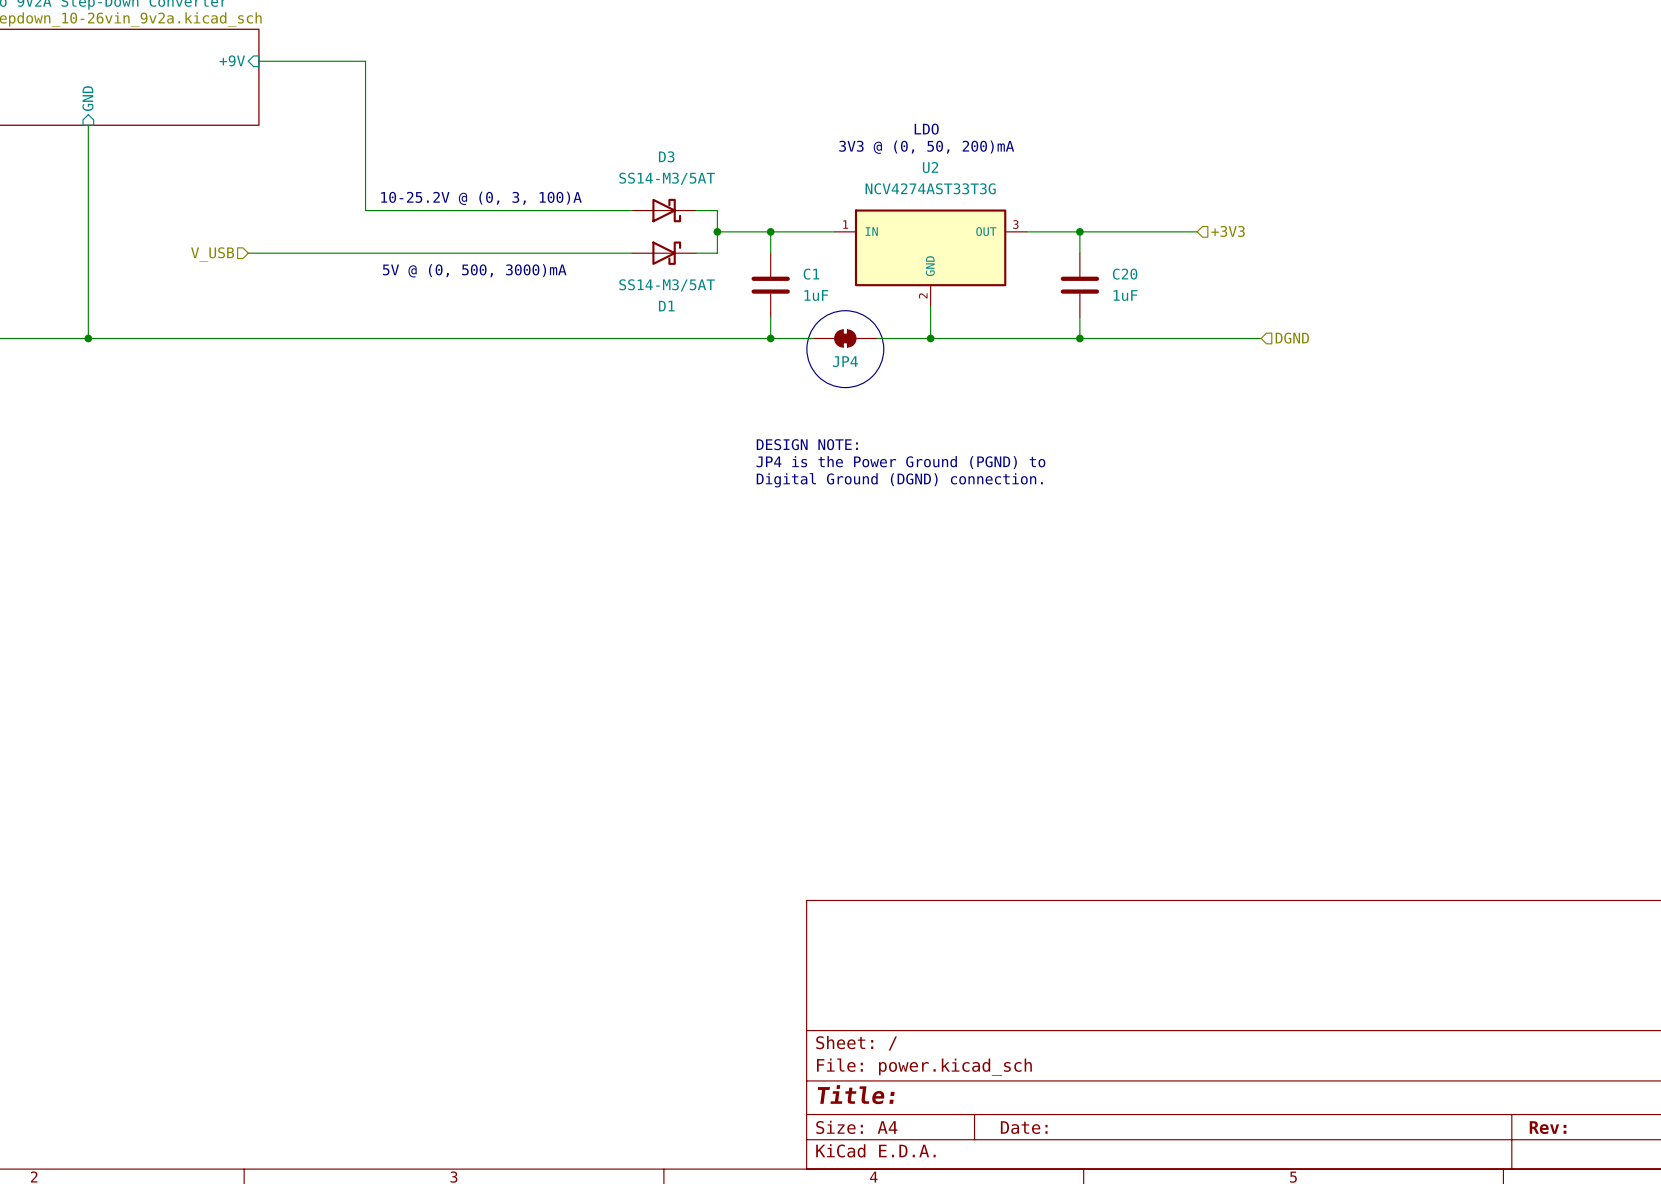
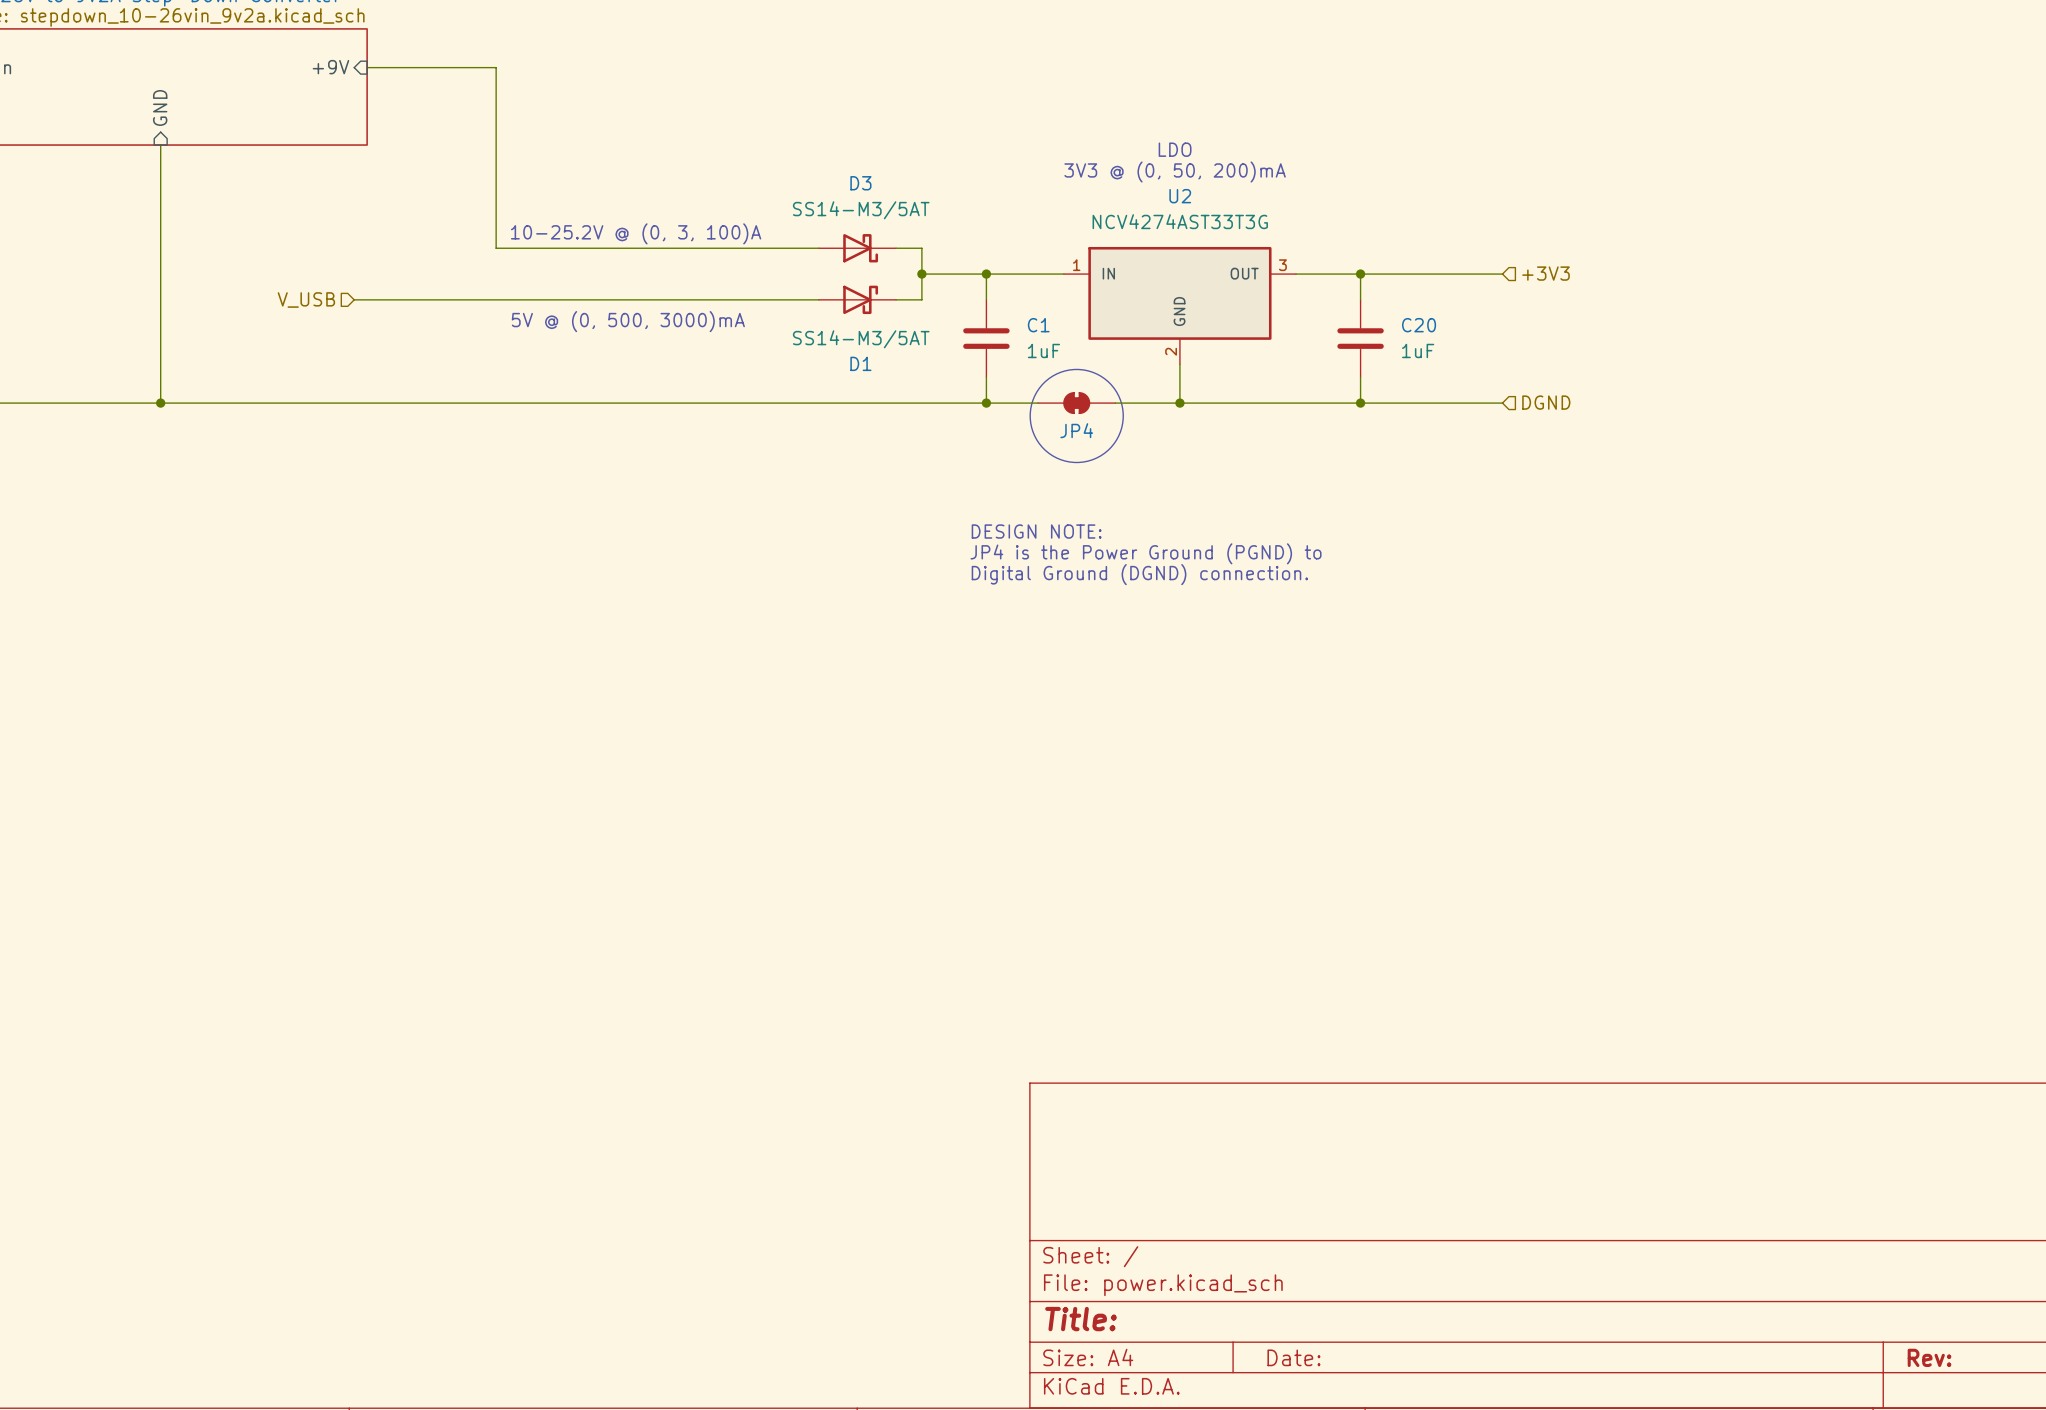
wire: (1197, 338) (1261, 338) -> none
hierarchical label position: DGND (1292, 338) -> DGND (1546, 402)

